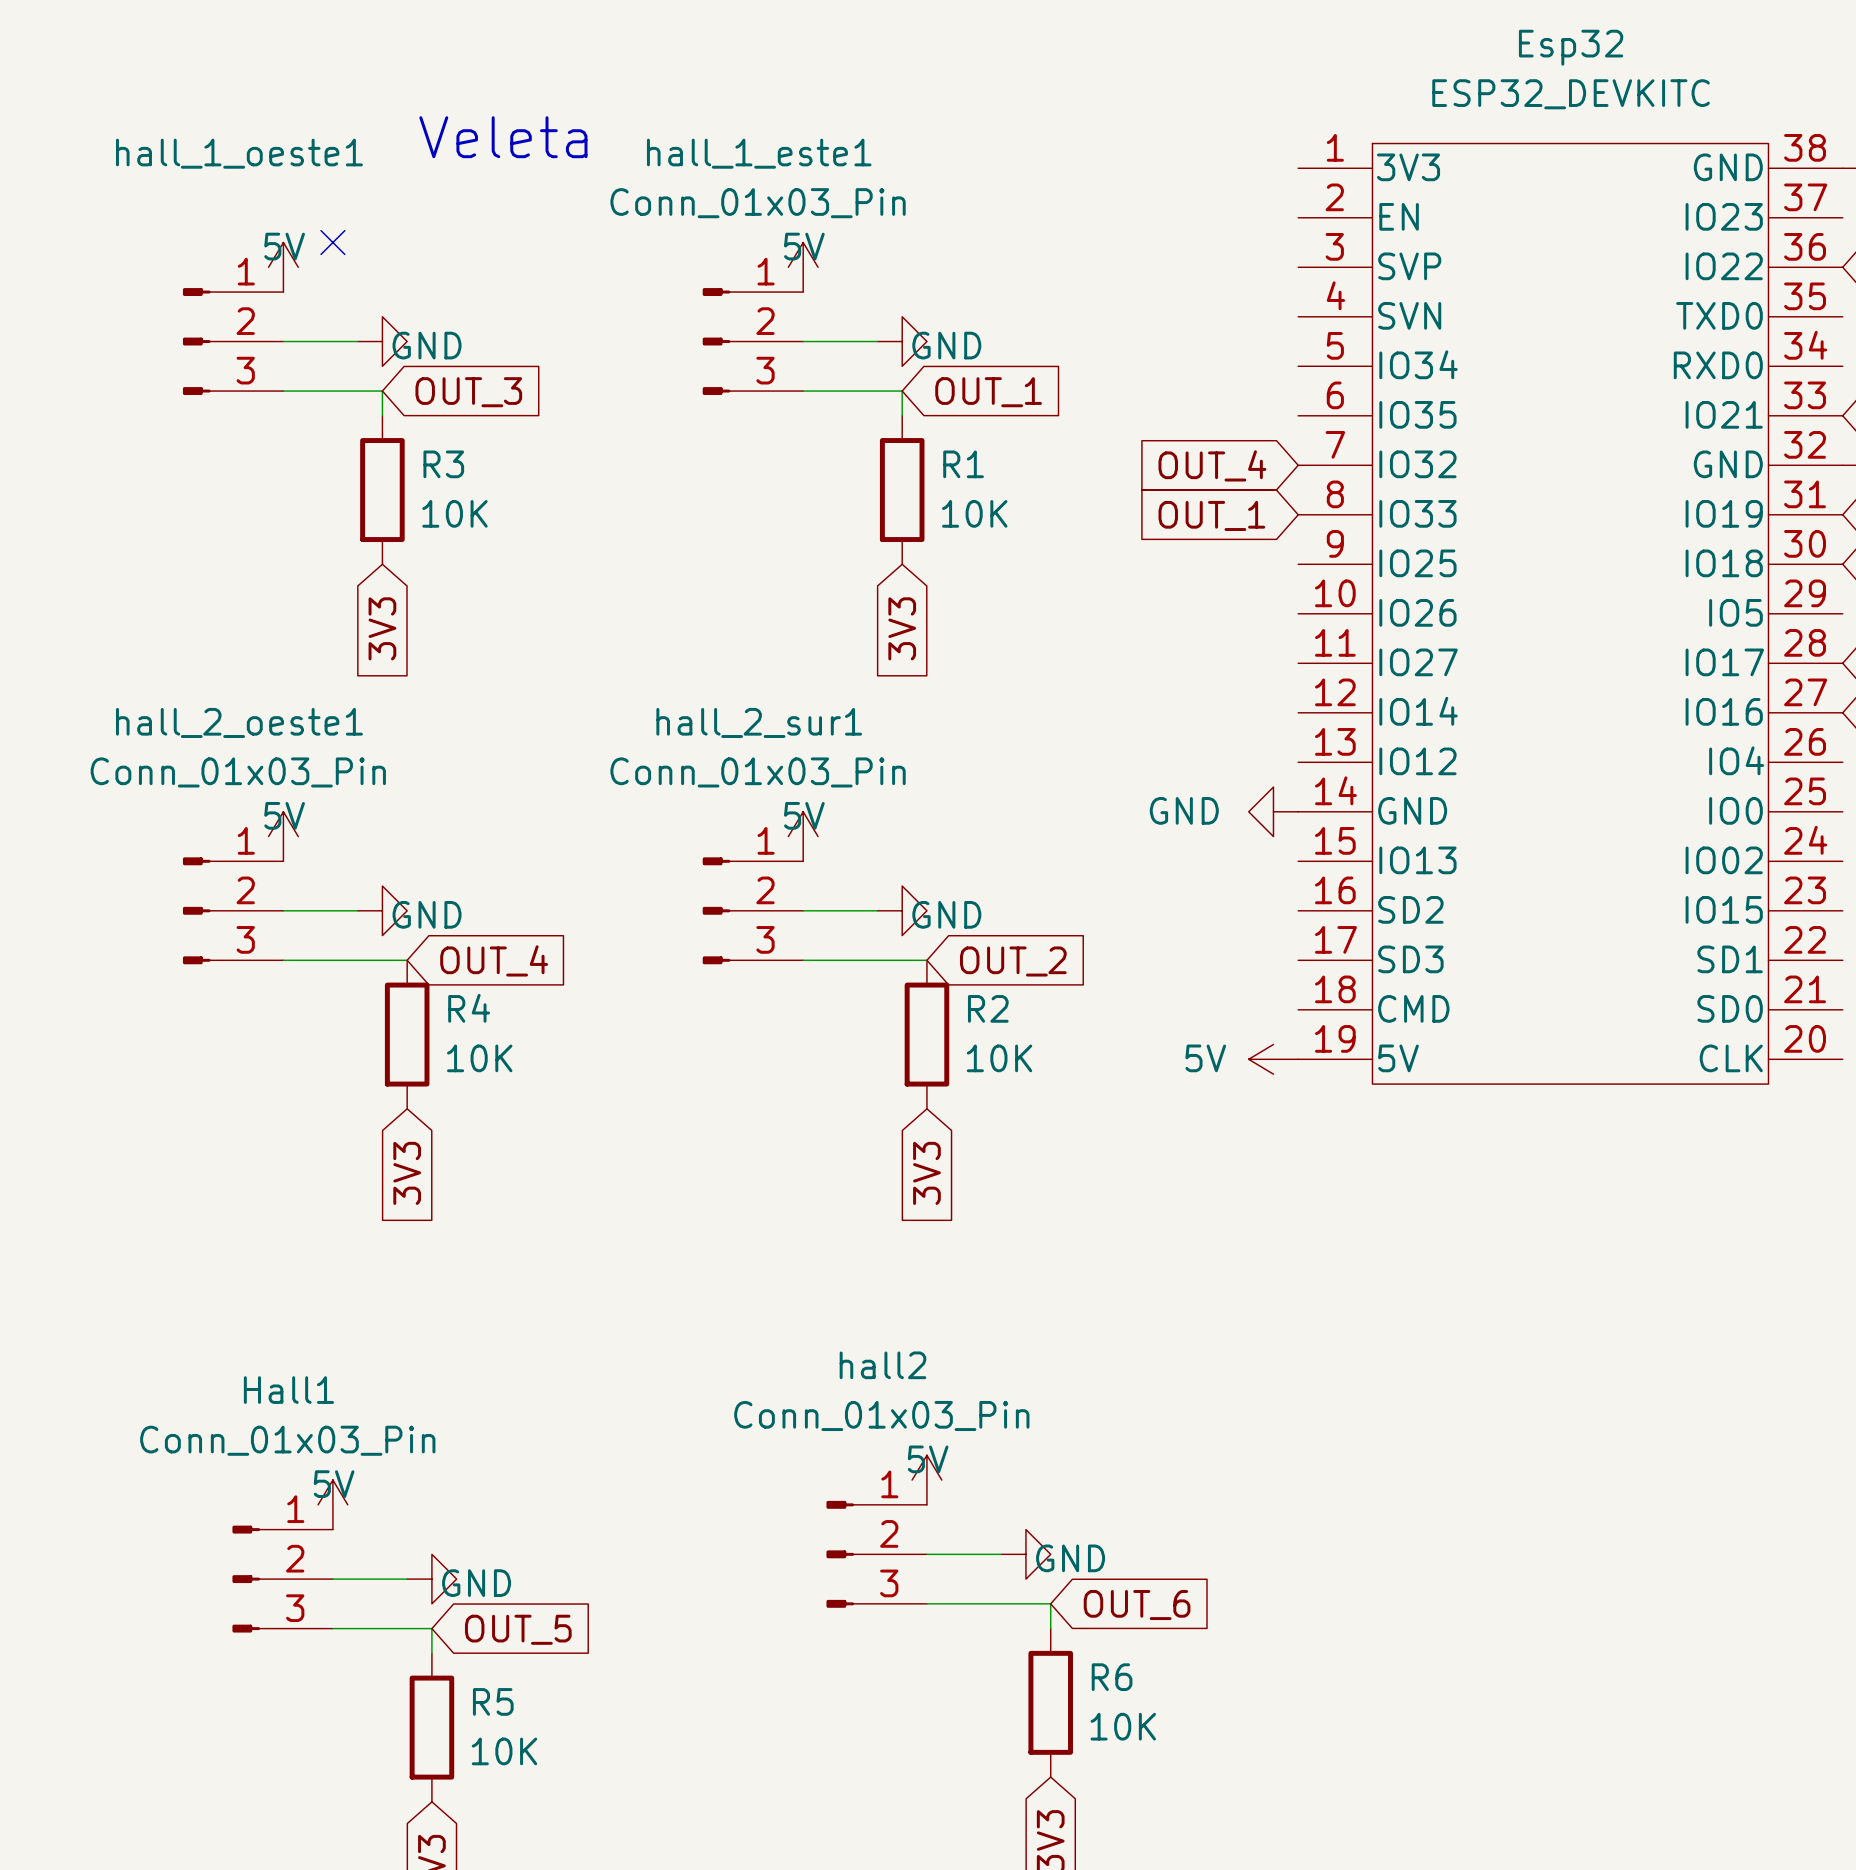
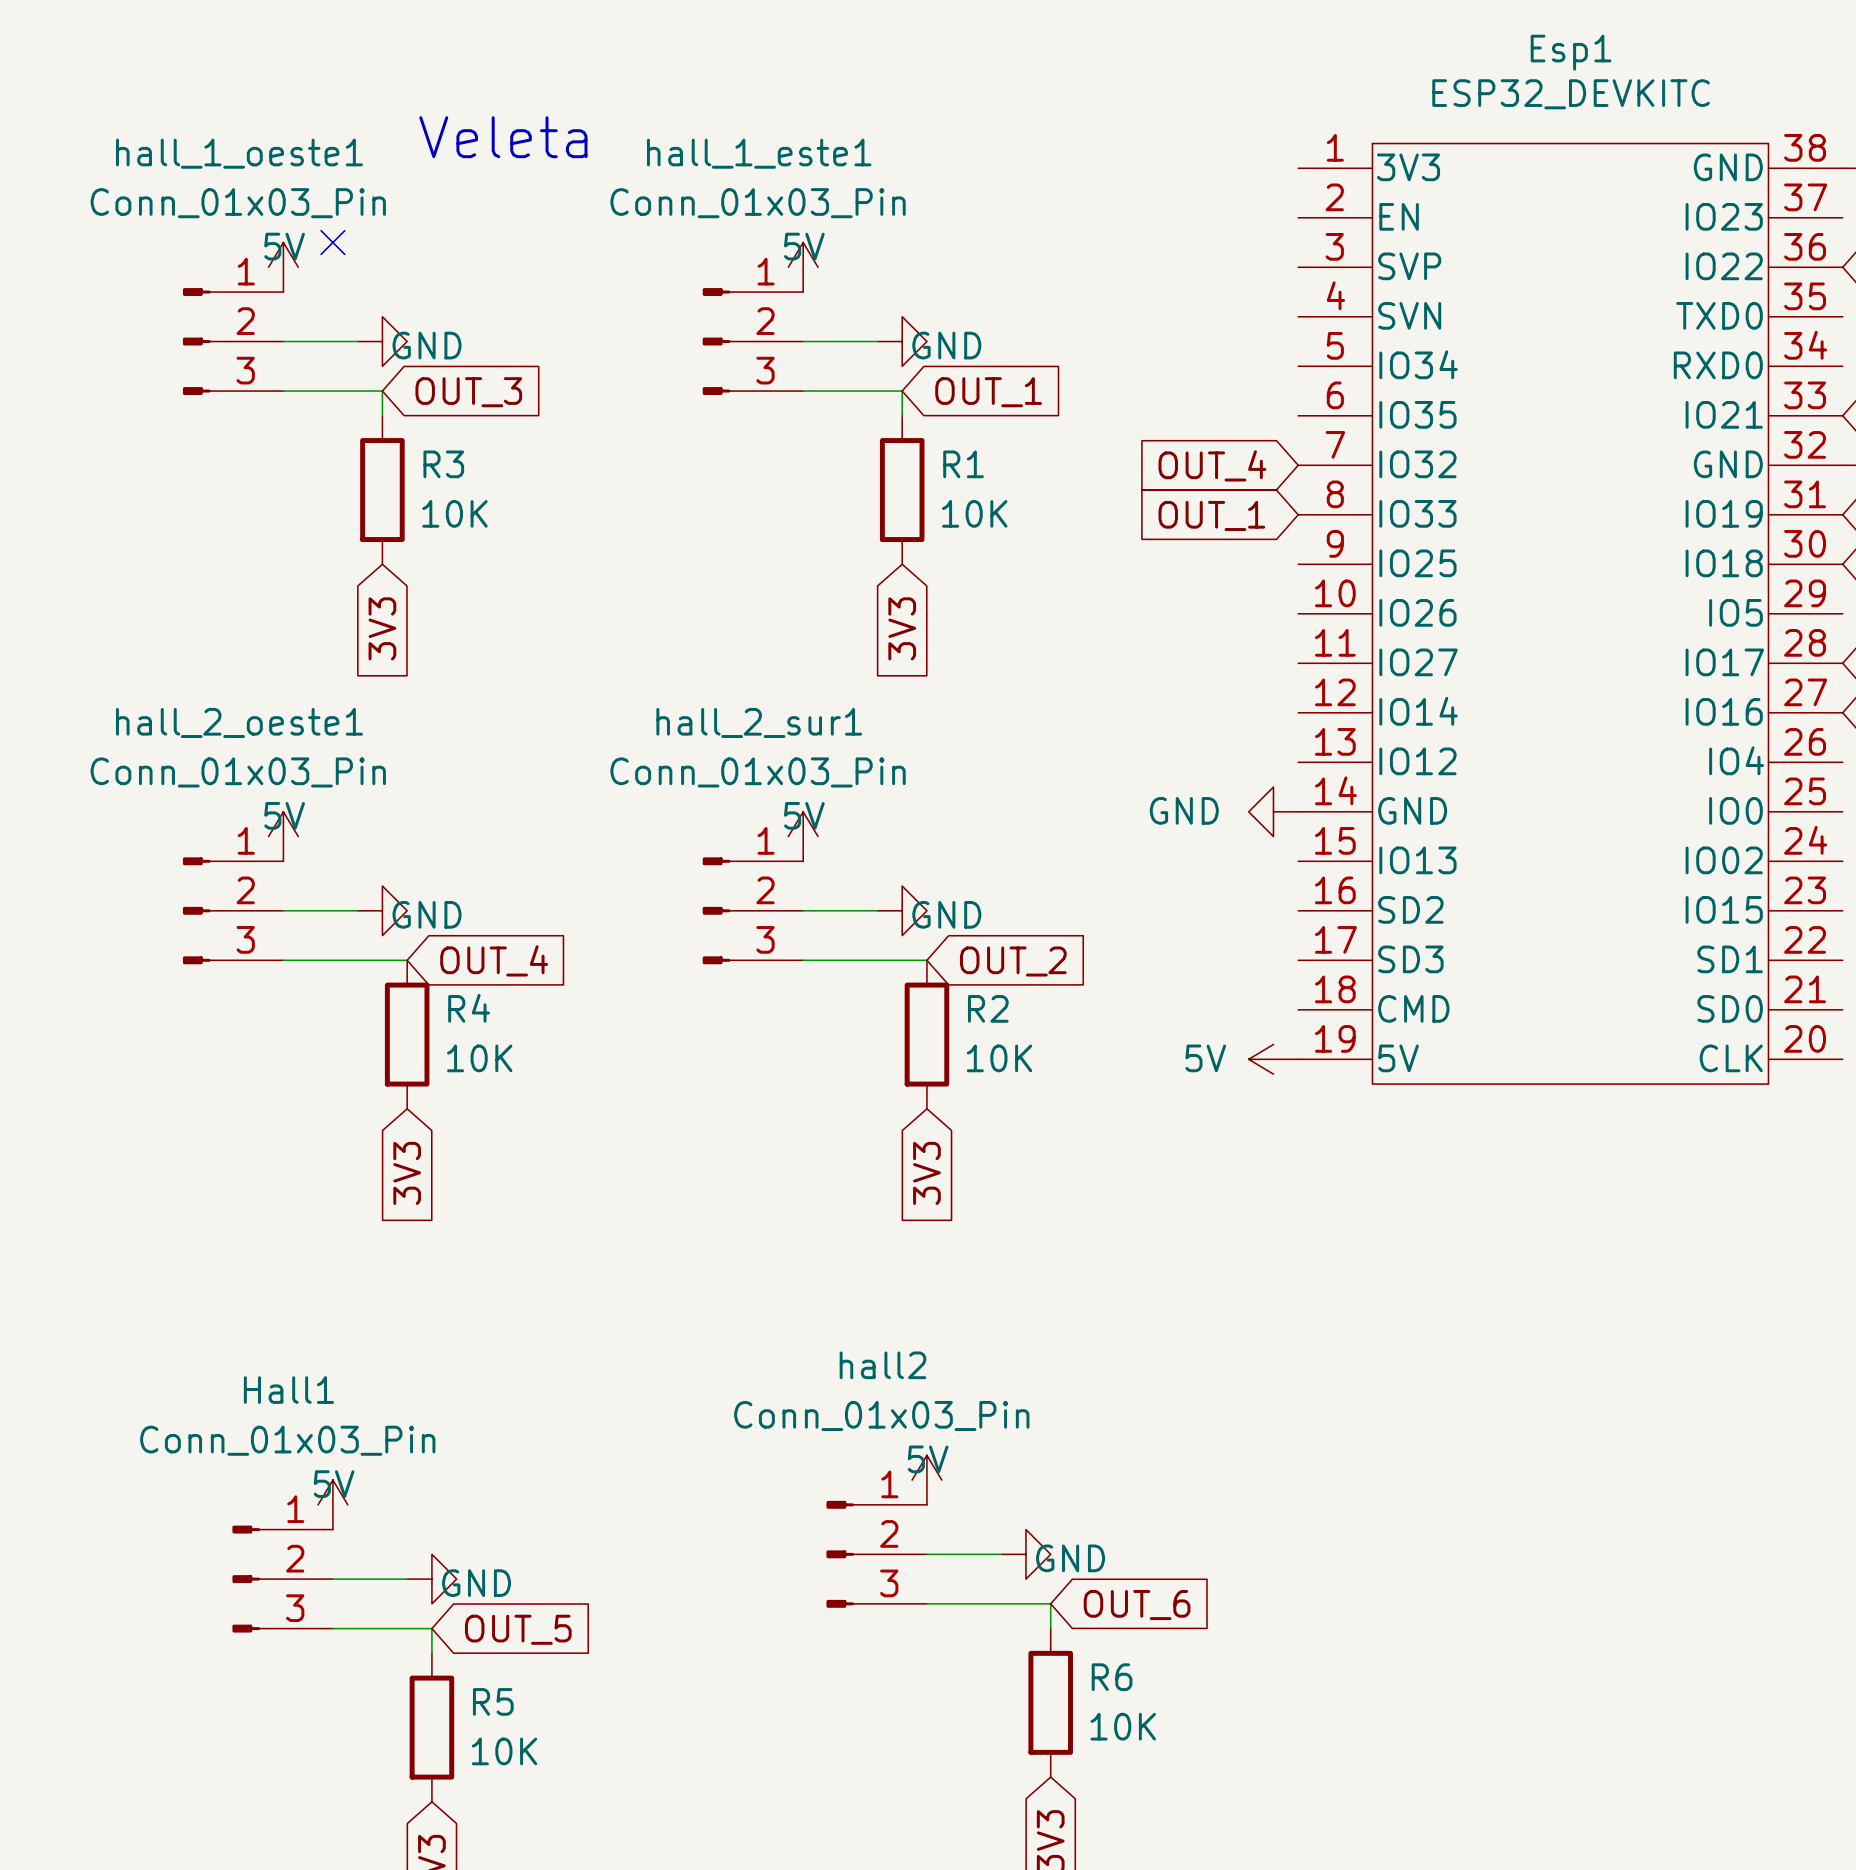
Esp32 name: Esp32 (1571, 47) -> Esp1 (1571, 52)
hall_1_oeste1 value: none -> Conn_01x03_Pin (238, 203)

